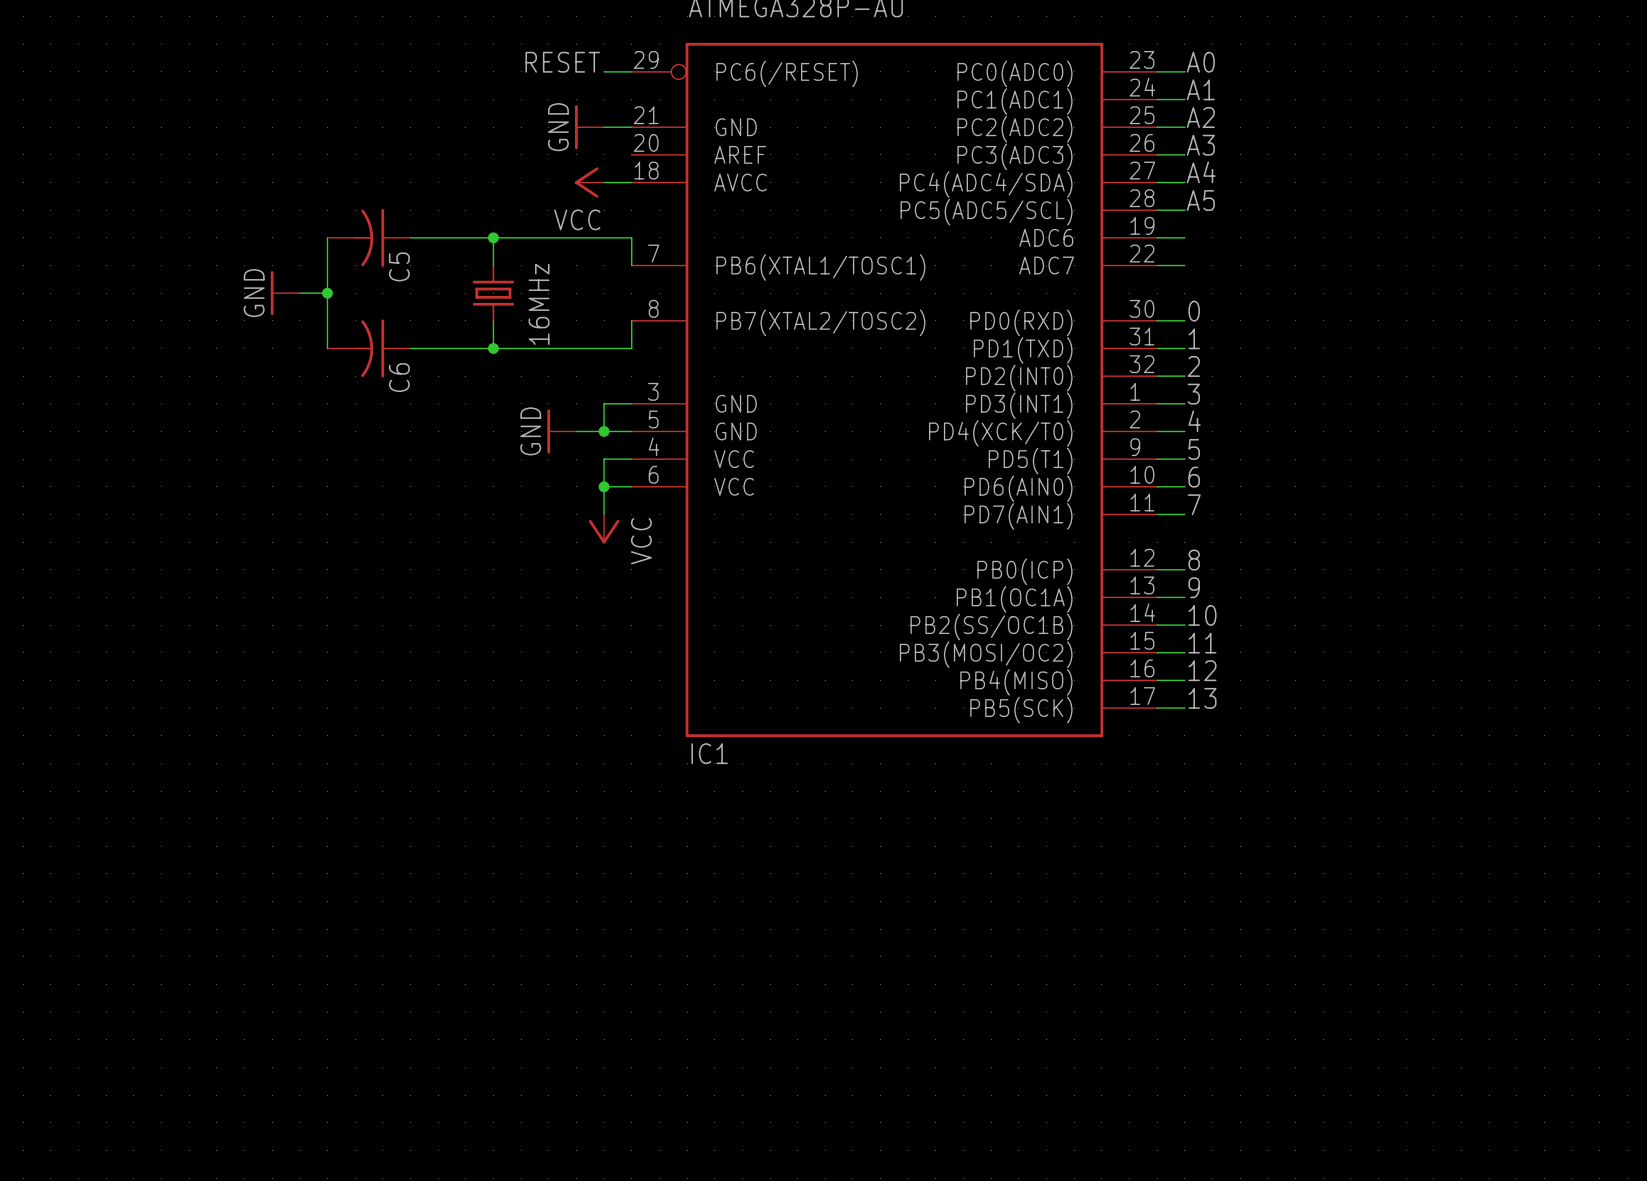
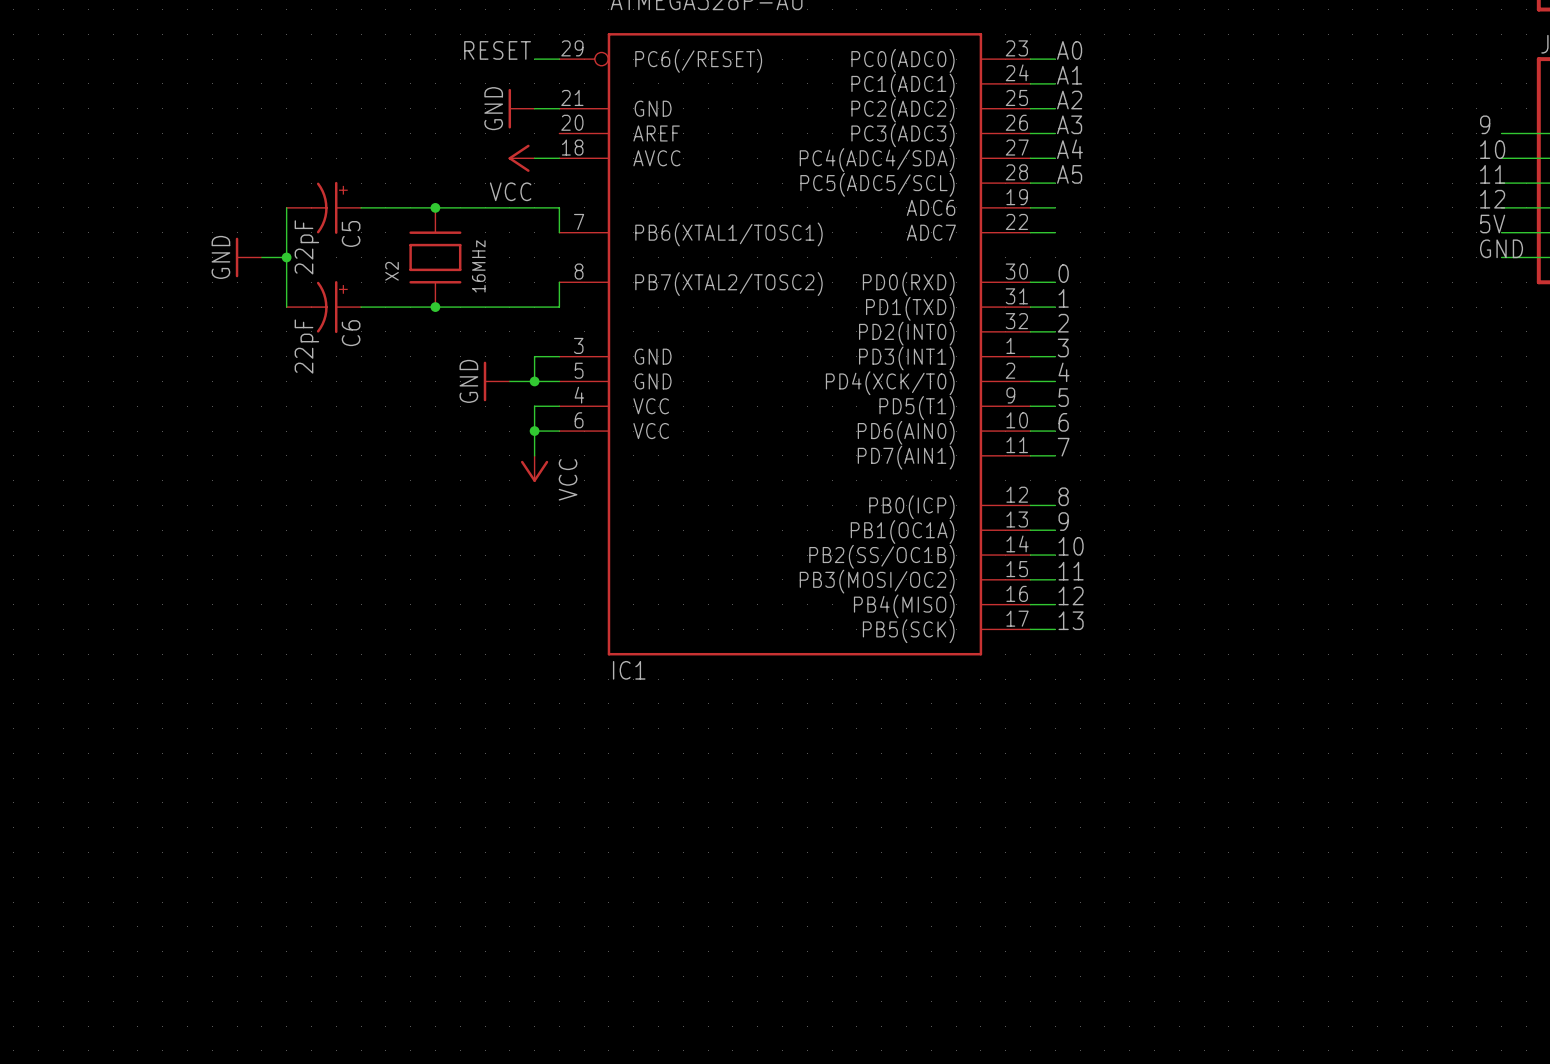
C5 symbol: [327, 208, 411, 267] -> [286, 181, 362, 234]
C5 value: none -> 22pF (306, 247)
part: 16MHz (493, 293) -> none
X2: none -> 16MHz (435, 257)
C6 symbol: [327, 319, 411, 378] -> [286, 281, 362, 334]
C6 value: none -> 22pF (306, 346)

